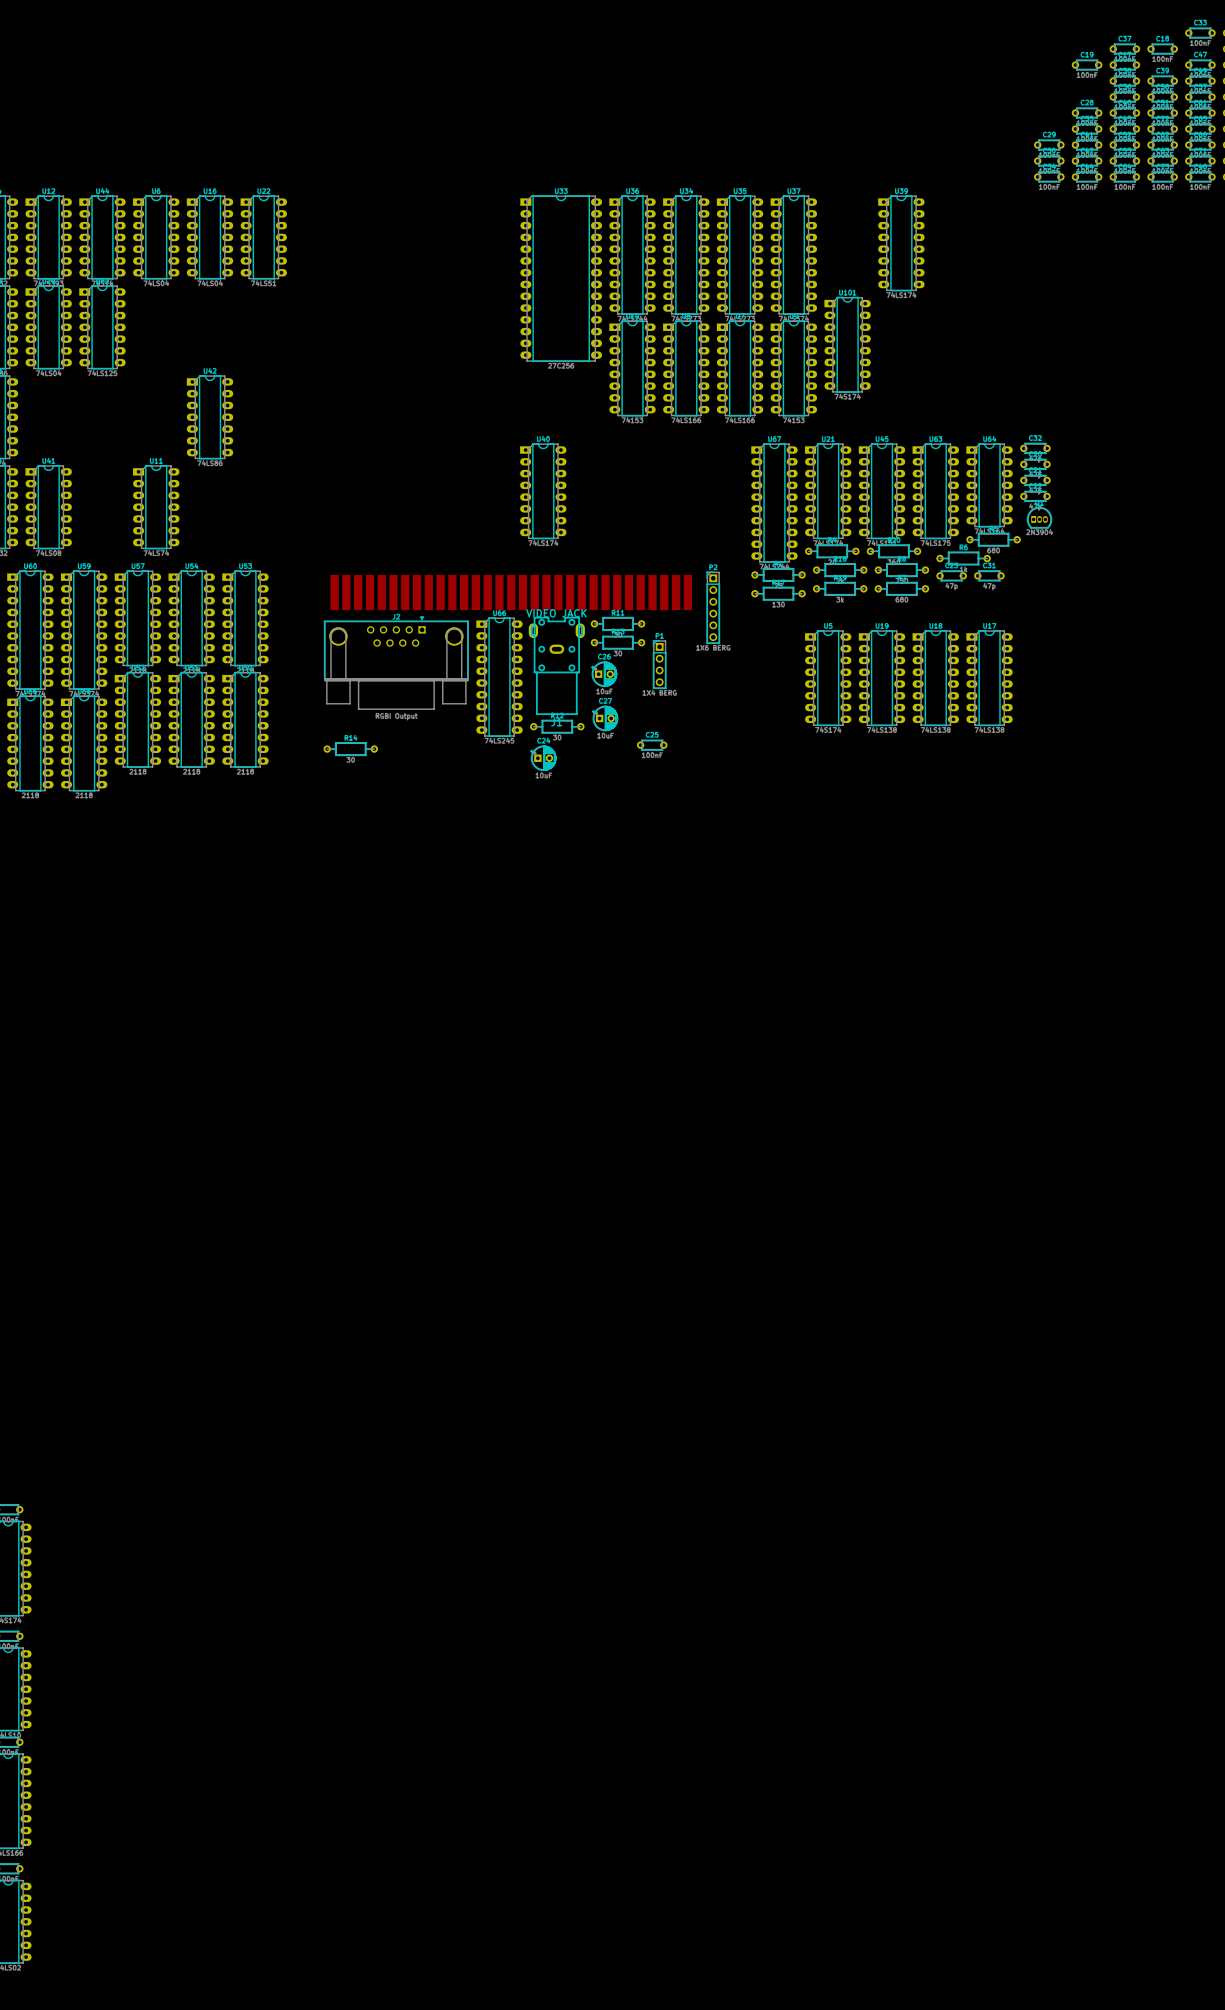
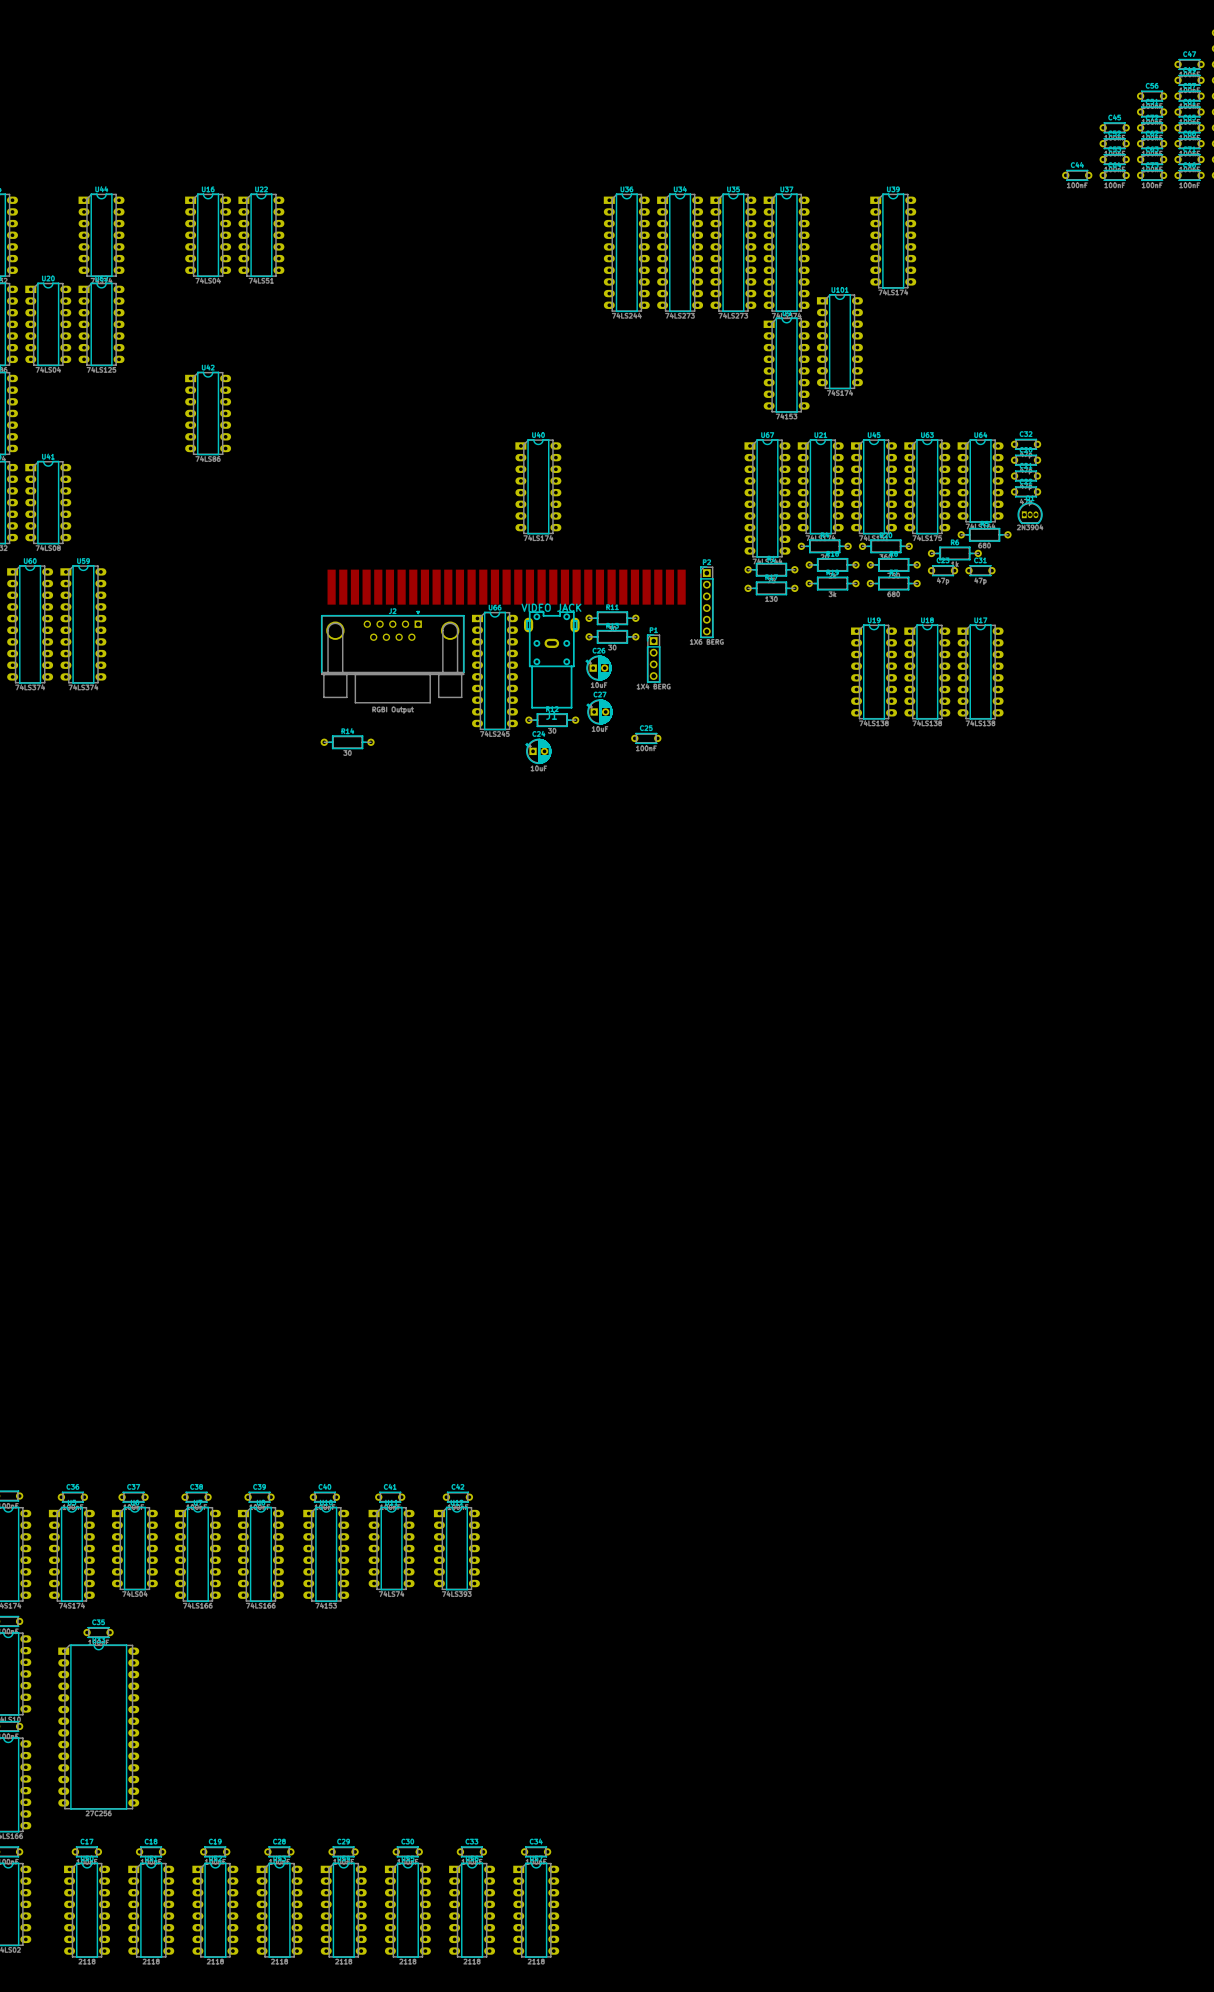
part position: (1200, 33) -> (471, 1851)
part position: (1124, 49) -> (133, 1497)
part position: (1162, 49) -> (151, 1851)
part position: (1087, 65) -> (215, 1851)
part position: (1124, 65) -> (86, 1851)
part position: (1124, 81) -> (196, 1497)
part position: (1162, 81) -> (259, 1497)
part position: (1124, 97) -> (72, 1497)
part position: (1087, 113) -> (279, 1851)
part position: (1124, 113) -> (324, 1497)
part position: (1087, 129) -> (98, 1632)
part position: (1049, 144) -> (343, 1851)
part position: (1087, 144) -> (390, 1497)
part position: (1049, 160) -> (407, 1851)
part position: (1087, 160) -> (457, 1497)
part position: (1049, 176) -> (536, 1851)
part position: (48, 237) -> (456, 1548)
part position: (156, 237) -> (134, 1548)
part position: (561, 278) -> (98, 1727)
part position: (632, 368) -> (326, 1554)
part position: (686, 368) -> (260, 1554)
part position: (740, 368) -> (197, 1554)
part position: (156, 507) -> (391, 1548)
part position: (137, 618) -> (536, 1910)
part position: (191, 618) -> (343, 1910)
part position: (245, 618) -> (279, 1910)
part position: (828, 678) -> (71, 1554)
part position: (137, 719) -> (215, 1910)
part position: (191, 719) -> (151, 1910)
part position: (245, 719) -> (87, 1910)
part position: (30, 743) -> (407, 1910)
part position: (84, 743) -> (472, 1910)

